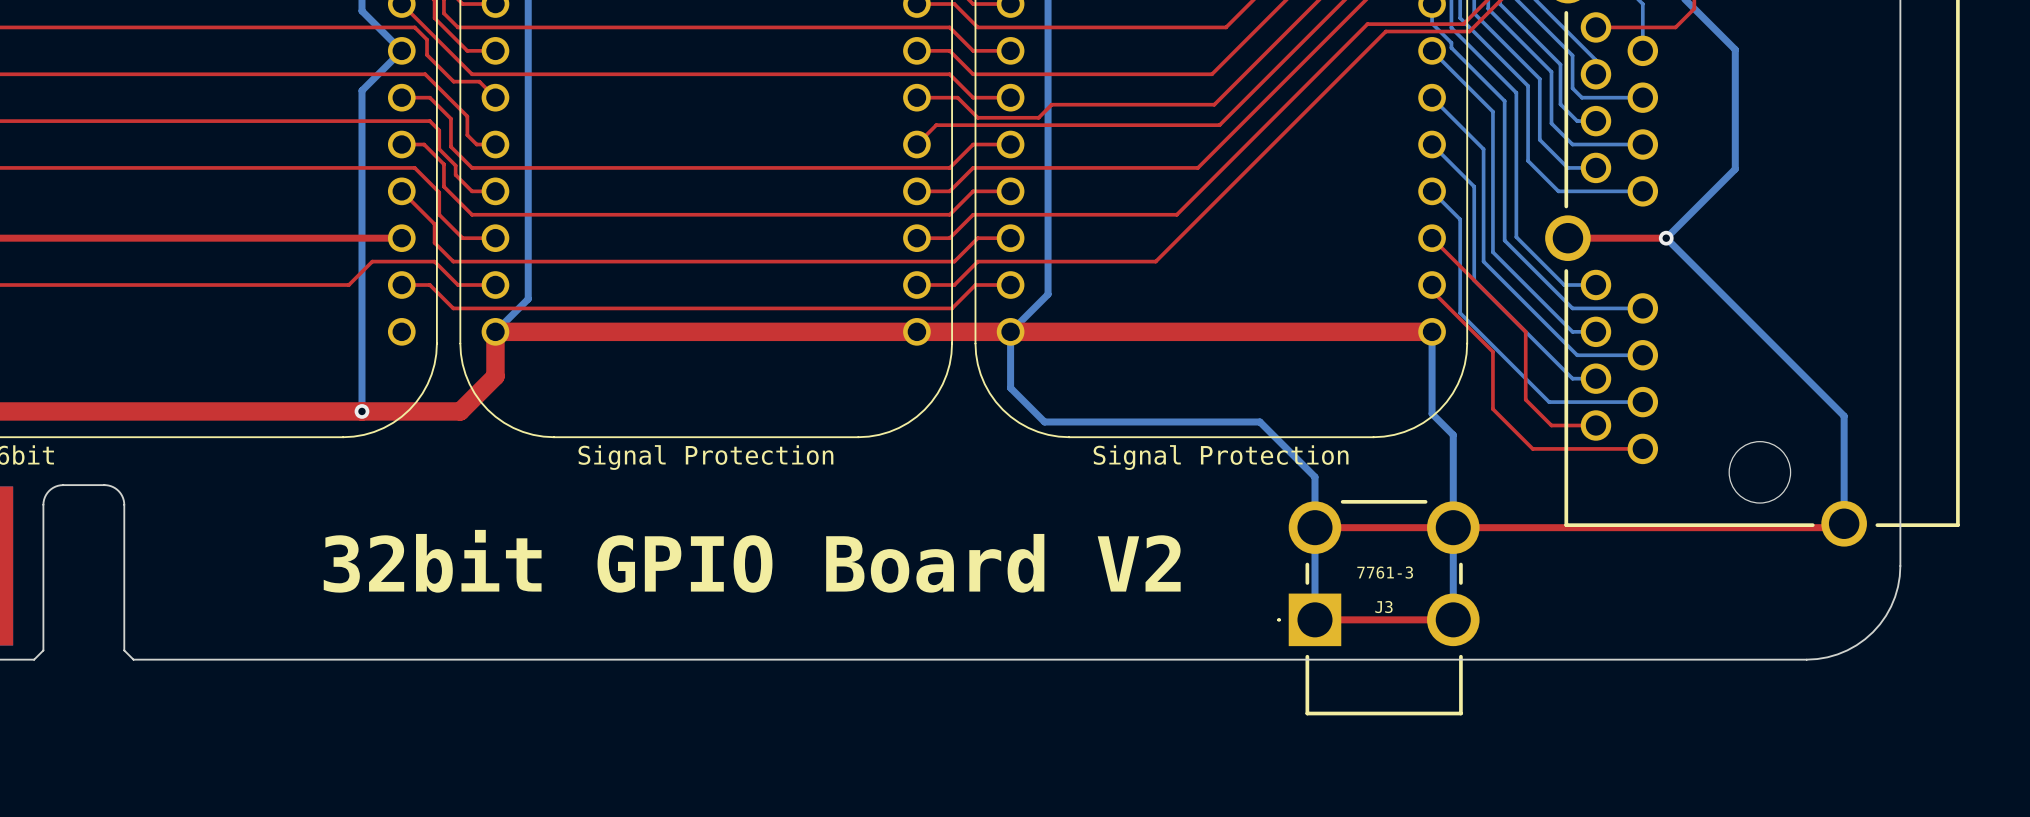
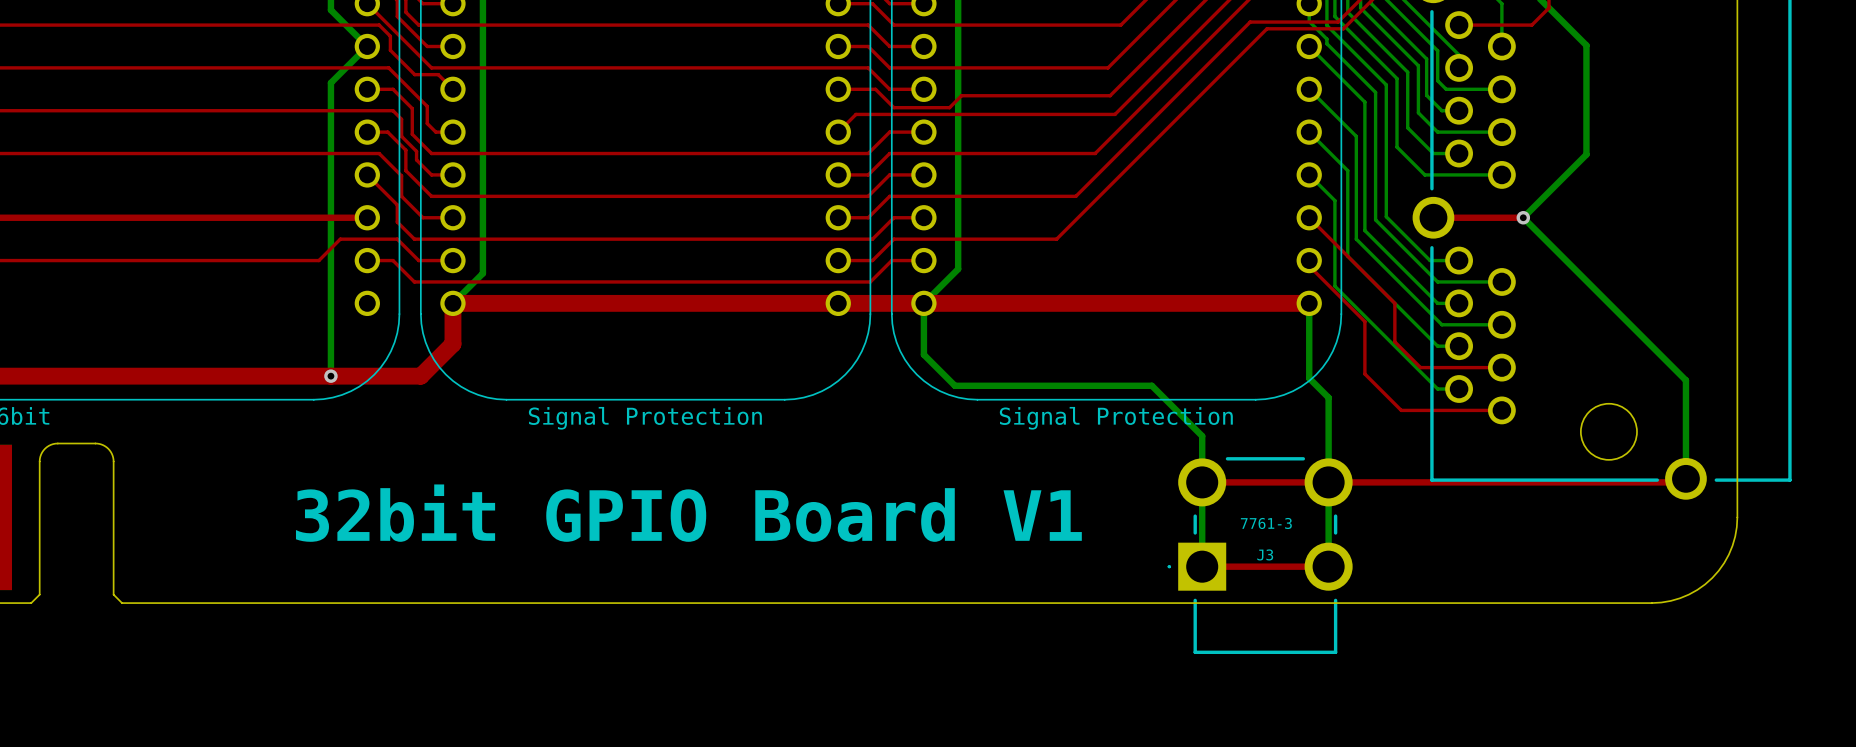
top track: (1525, 373) (1525, 399) (1551, 425) (1595, 425) -> (1394, 341) (1420, 367) (1501, 367)
bottom track: (1549, 402) (1642, 402) -> (1416, 367) (1437, 389) (1459, 389)
text: 32bit GPIO Board V2 (752, 561) -> 32bit GPIO Board V1 (688, 513)

